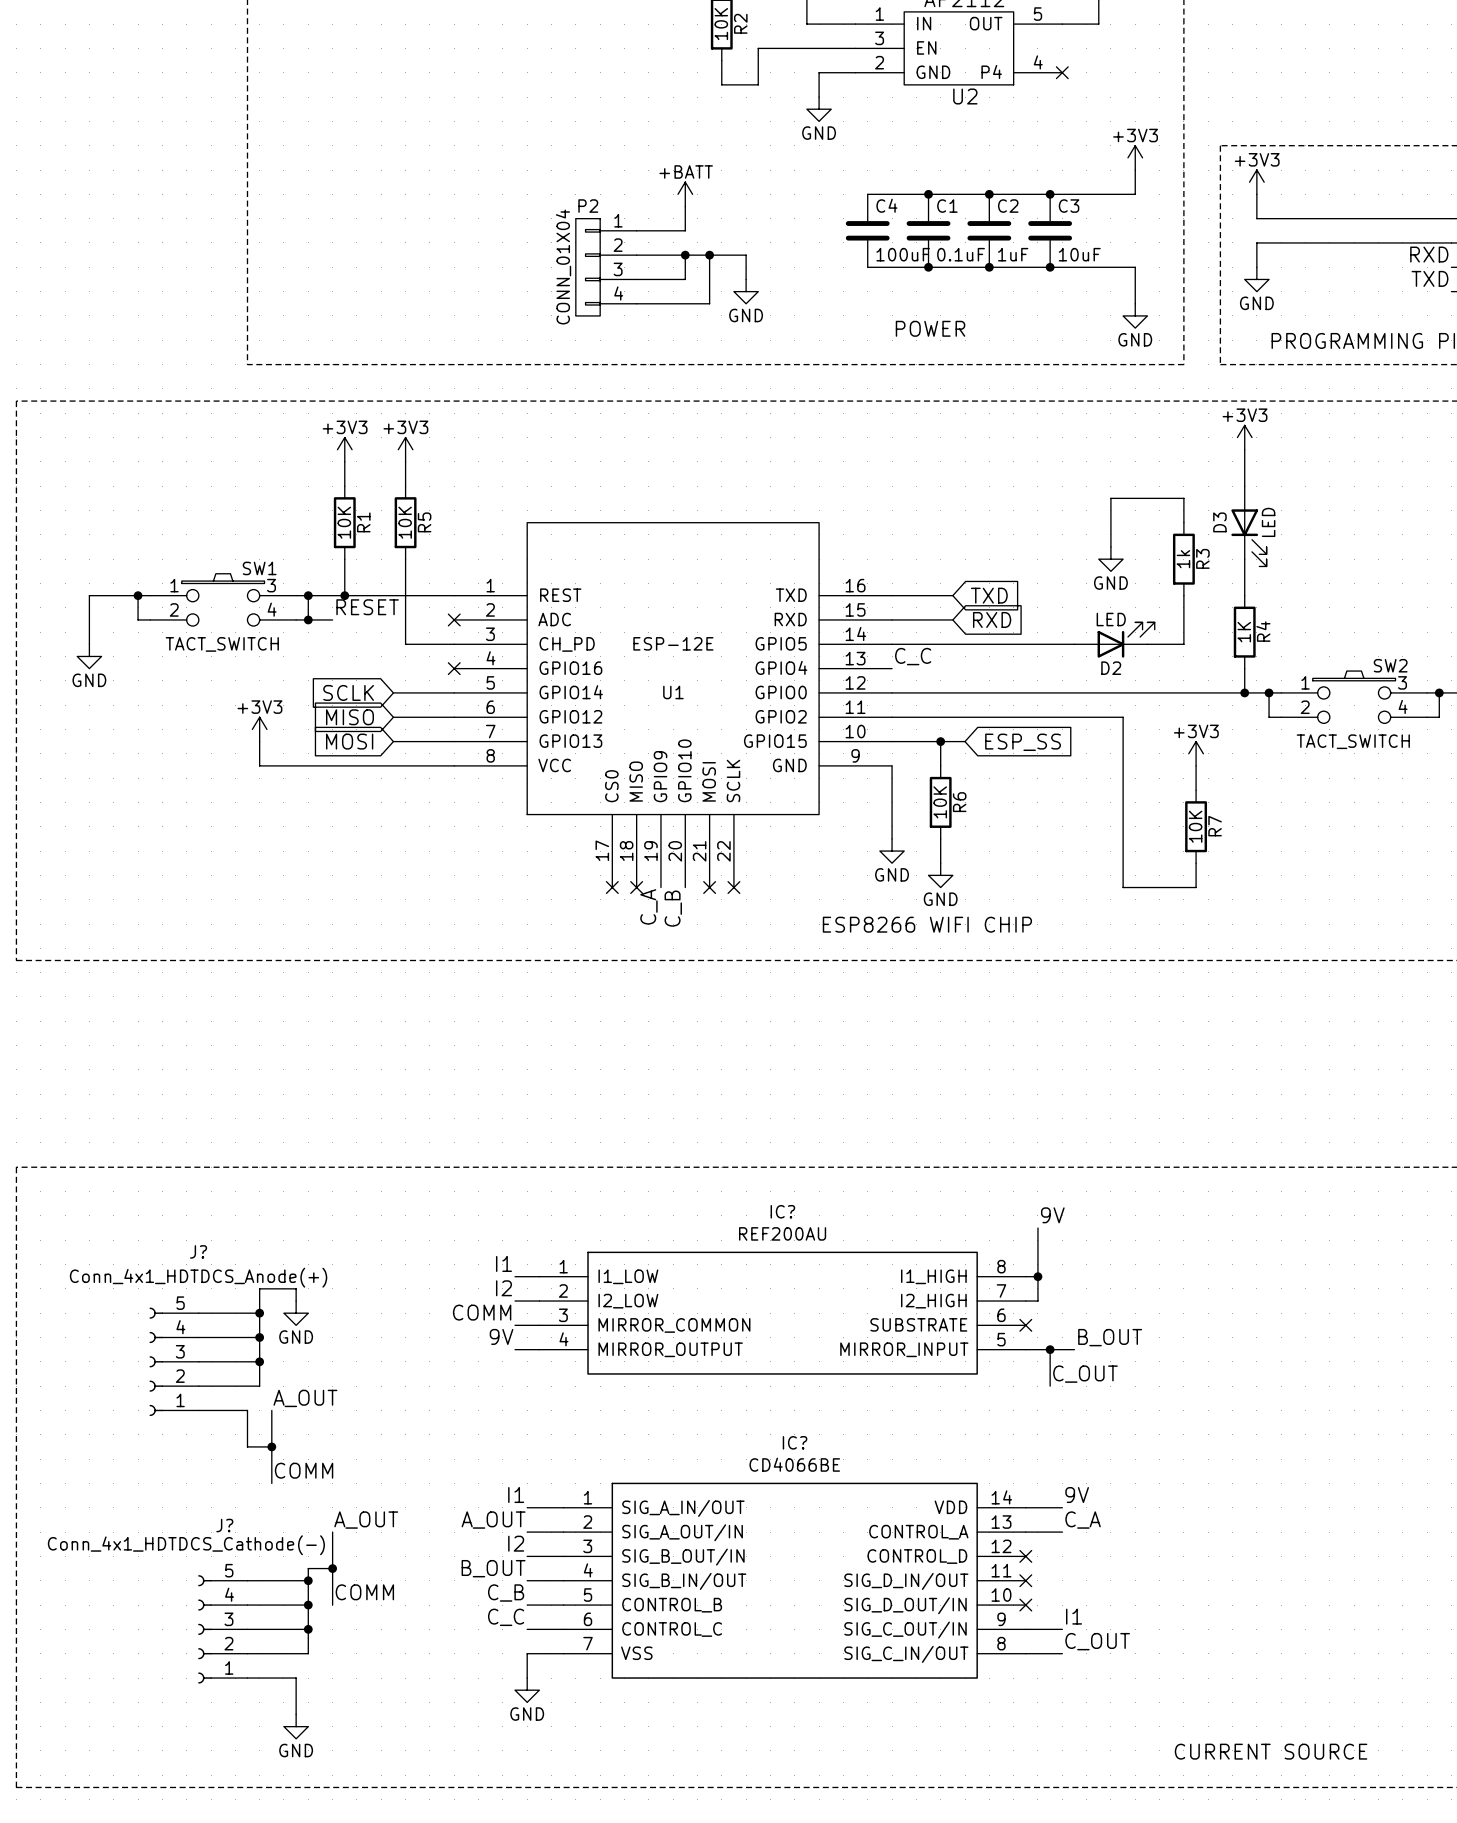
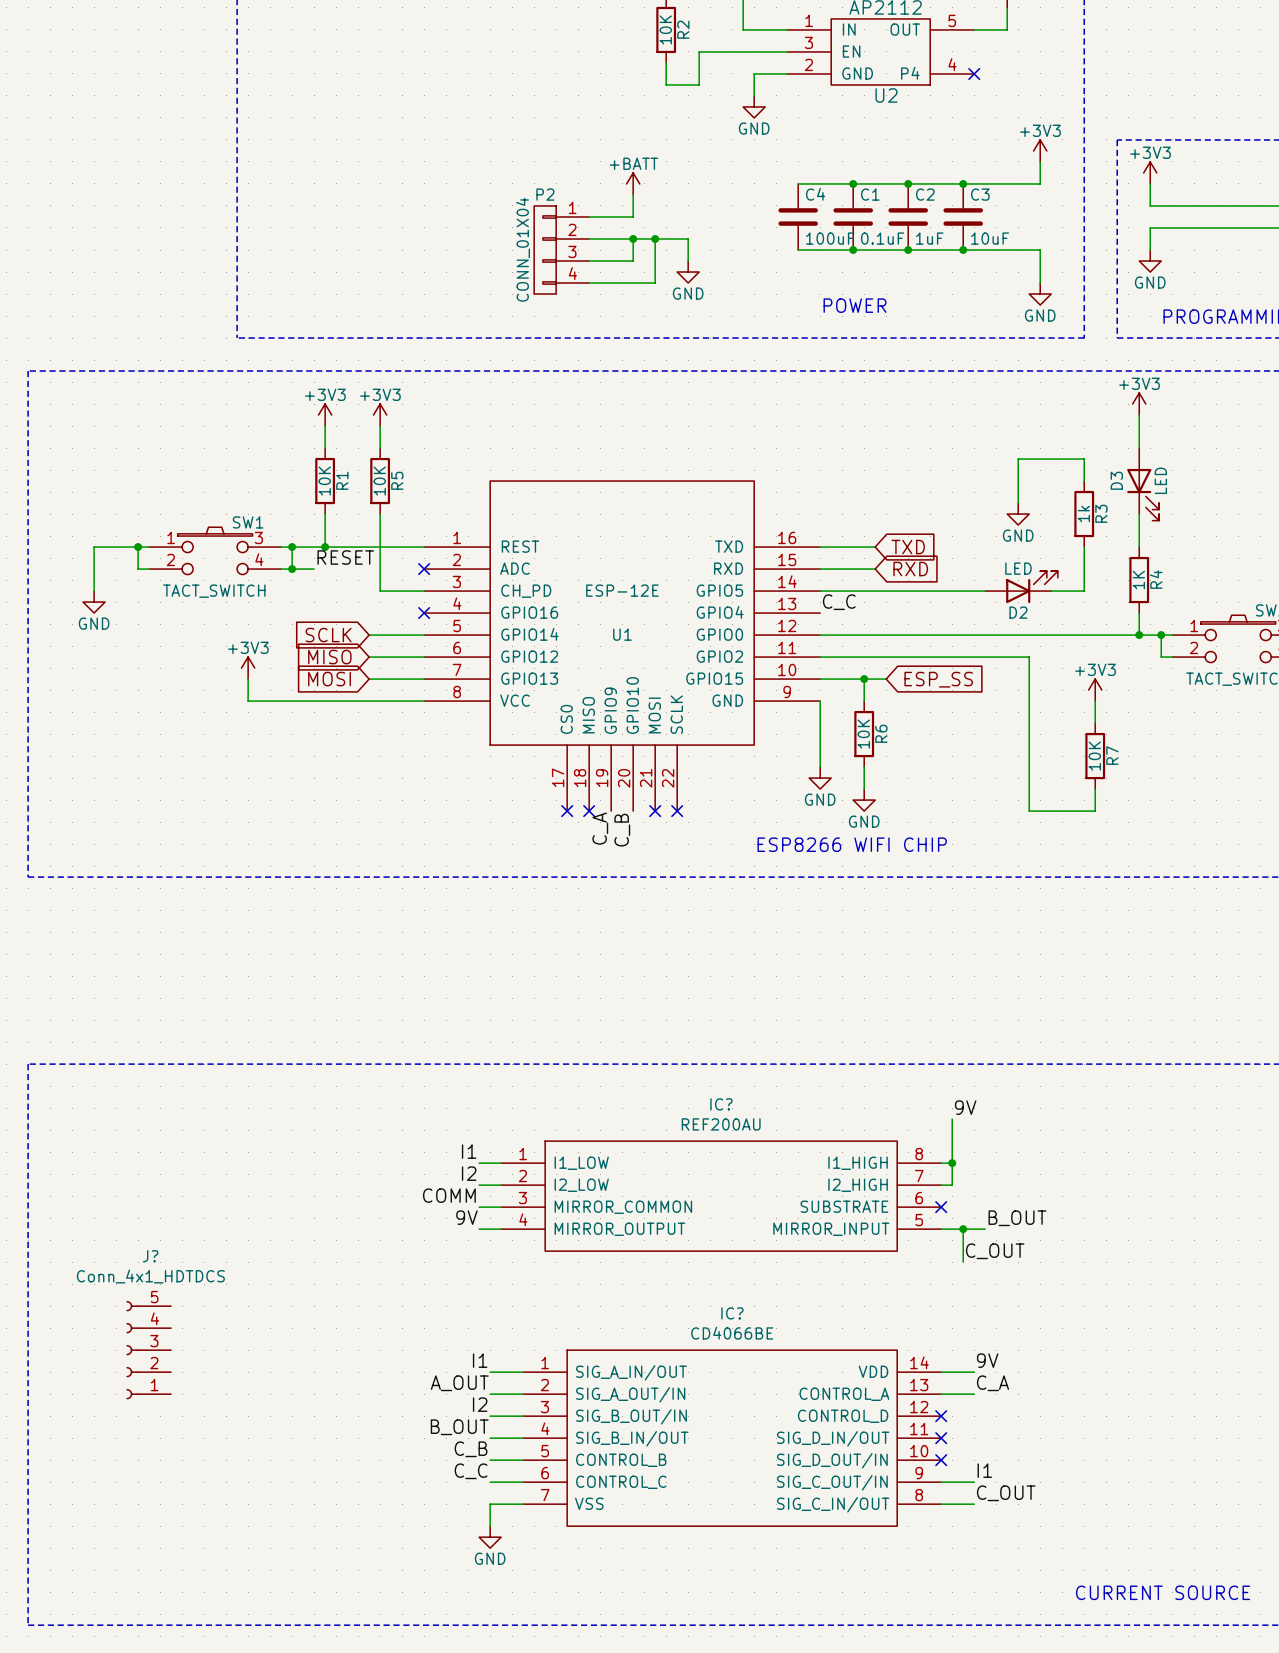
wire: (296, 1301) (296, 1288) (259, 1288) (259, 1386) (198, 1386) -> none
wire: (198, 1313) (259, 1313) -> none
junction: (259, 1313) -> none
power symbol: GND (296, 1313) -> none
wire: (198, 1337) (259, 1337) -> none
junction: (259, 1337) -> none
J?: Conn_4x1_HDTDCS_Anode(+) (174, 1361) -> none
wire: (198, 1361) (259, 1361) -> none
junction: (259, 1361) -> none
label: A_OUT (305, 1398) -> none
wire: (198, 1410) (247, 1410) (247, 1446) (271, 1446) -> none
wire: (271, 1410) (271, 1483) -> none
junction: (271, 1446) -> none
label: COMM (304, 1470) -> none
J?: none -> Conn_4x1_HDTDCS (148, 1350)
label: A_OUT (366, 1520) -> none
wire: (332, 1532) (332, 1605) -> none
wire: (332, 1568) (308, 1568) (308, 1653) (247, 1653) -> none
junction: (332, 1568) -> none
wire: (247, 1580) (308, 1580) -> none
junction: (308, 1580) -> none
label: COMM (364, 1592) -> none
wire: (247, 1605) (308, 1605) -> none
junction: (308, 1605) -> none
J?: Conn_4x1_HDTDCS_Cathode(-) (222, 1629) -> none
wire: (247, 1629) (308, 1629) -> none
junction: (308, 1629) -> none
wire: (247, 1678) (296, 1678) (296, 1714) -> none
power symbol: GND (296, 1726) -> none

